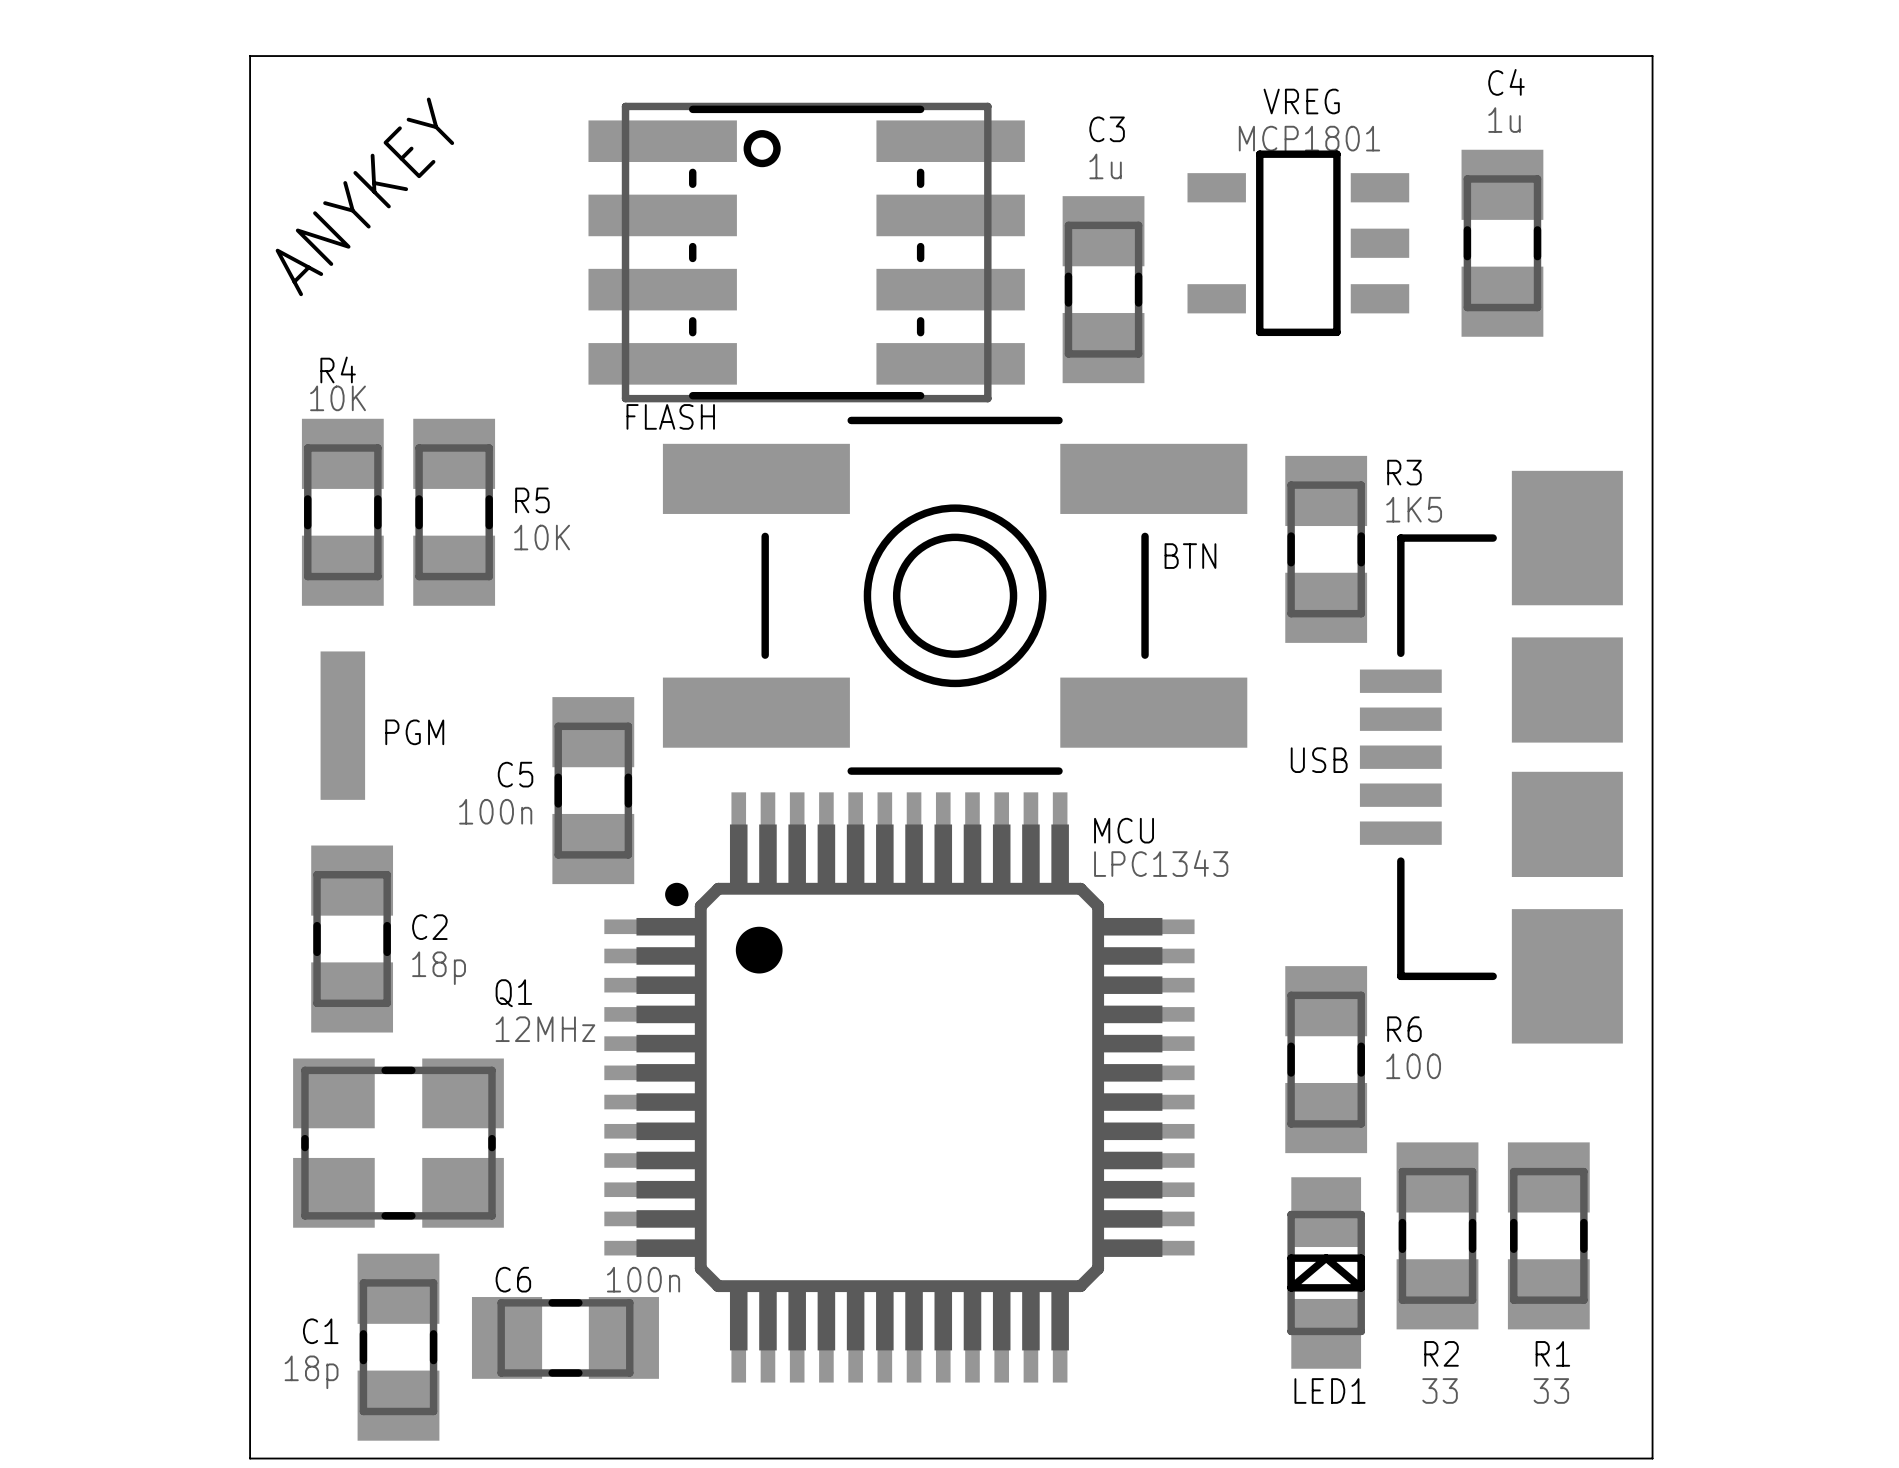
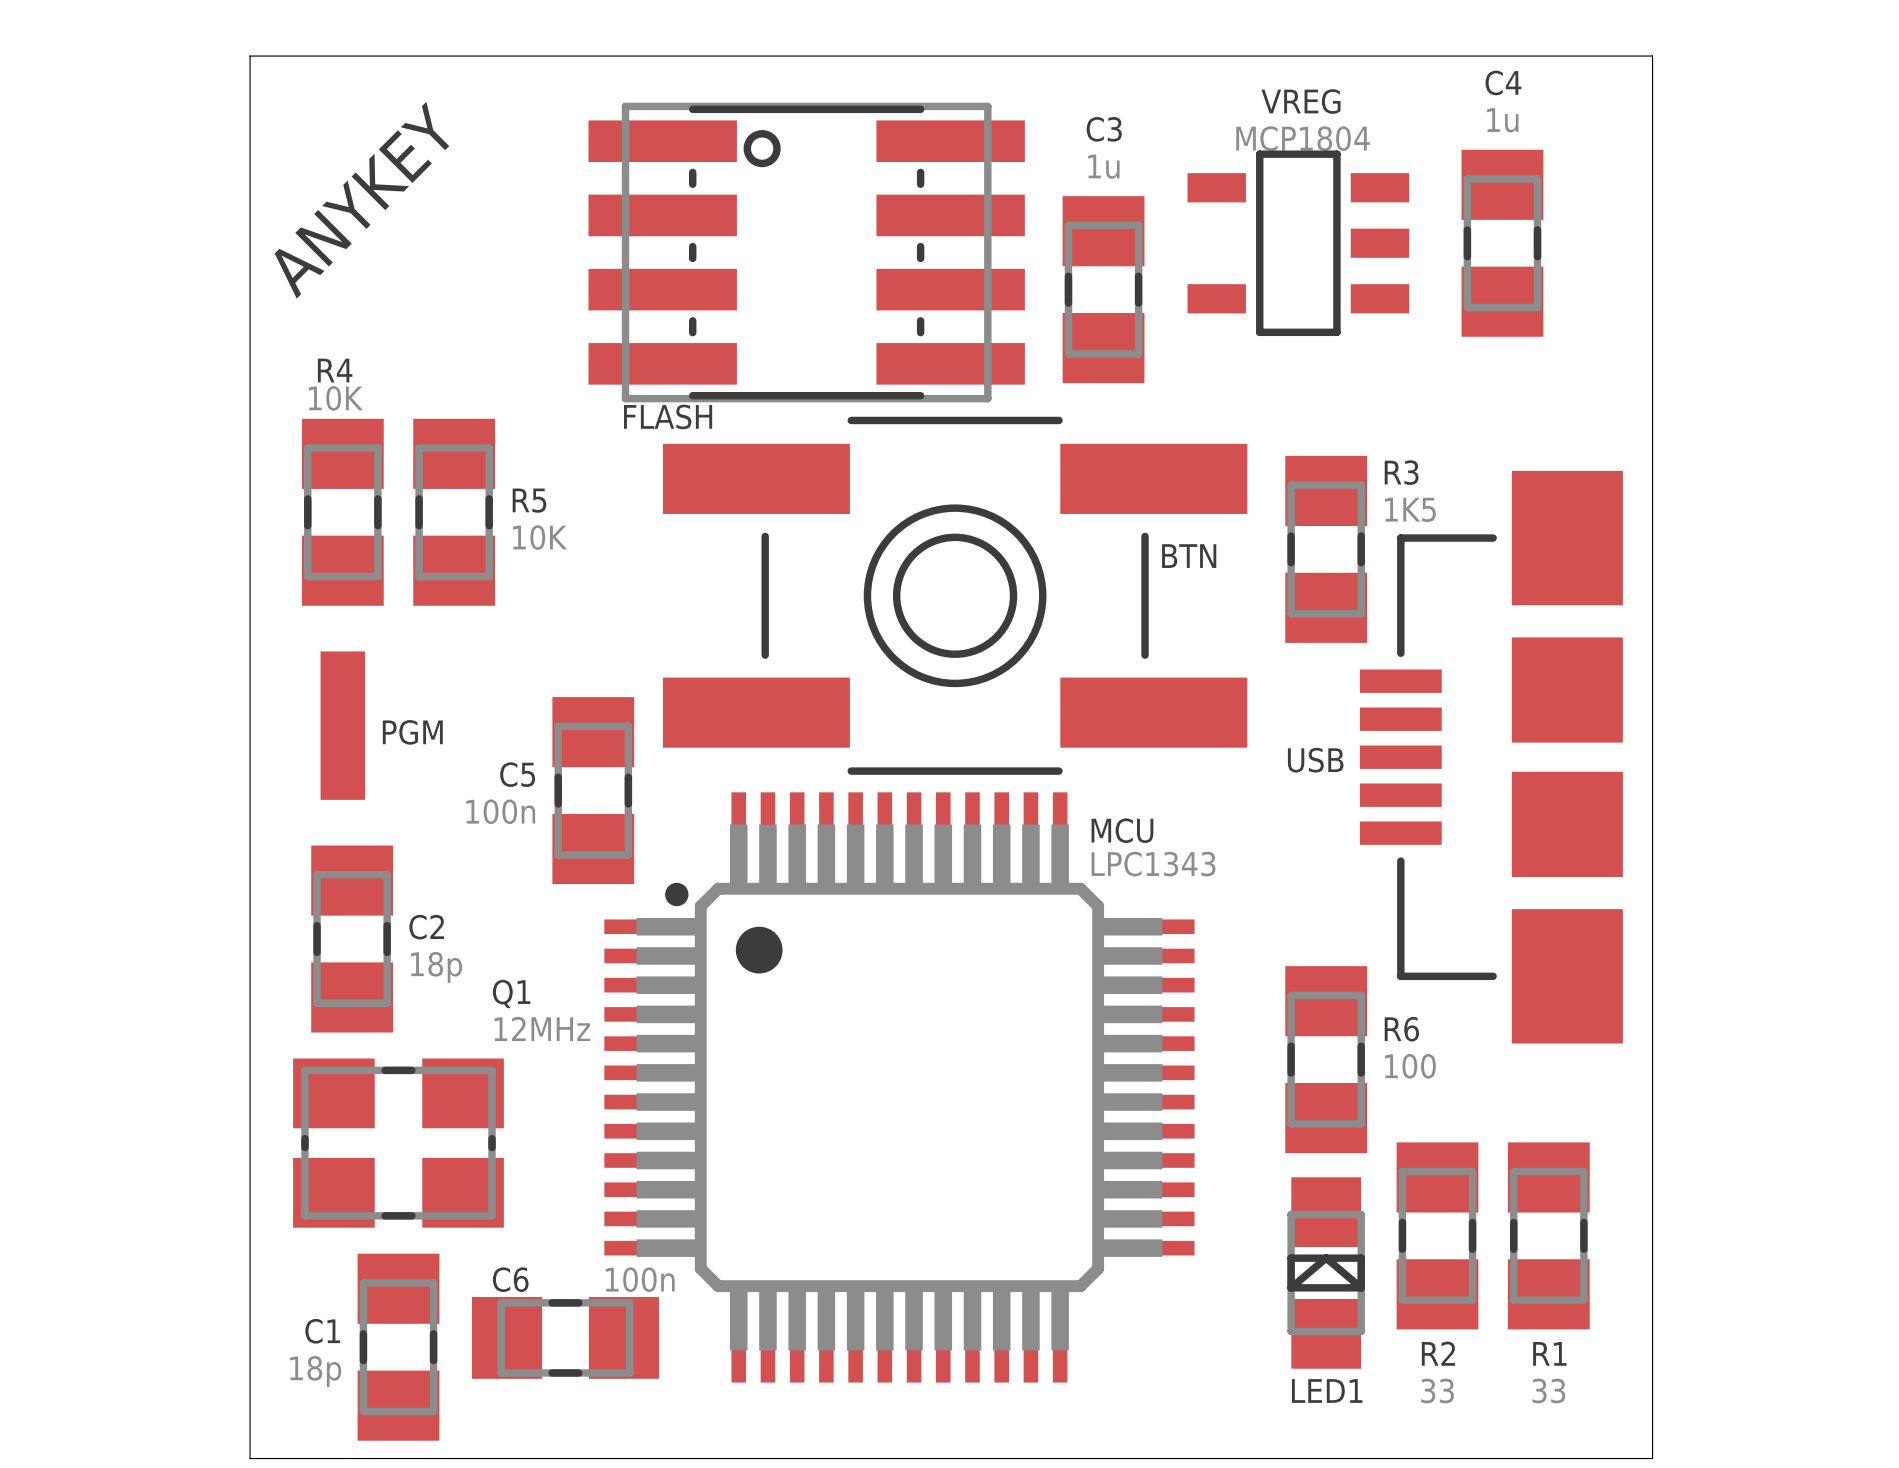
VREG value: MCP1801 (1309, 138) -> MCP1804 (1303, 138)

